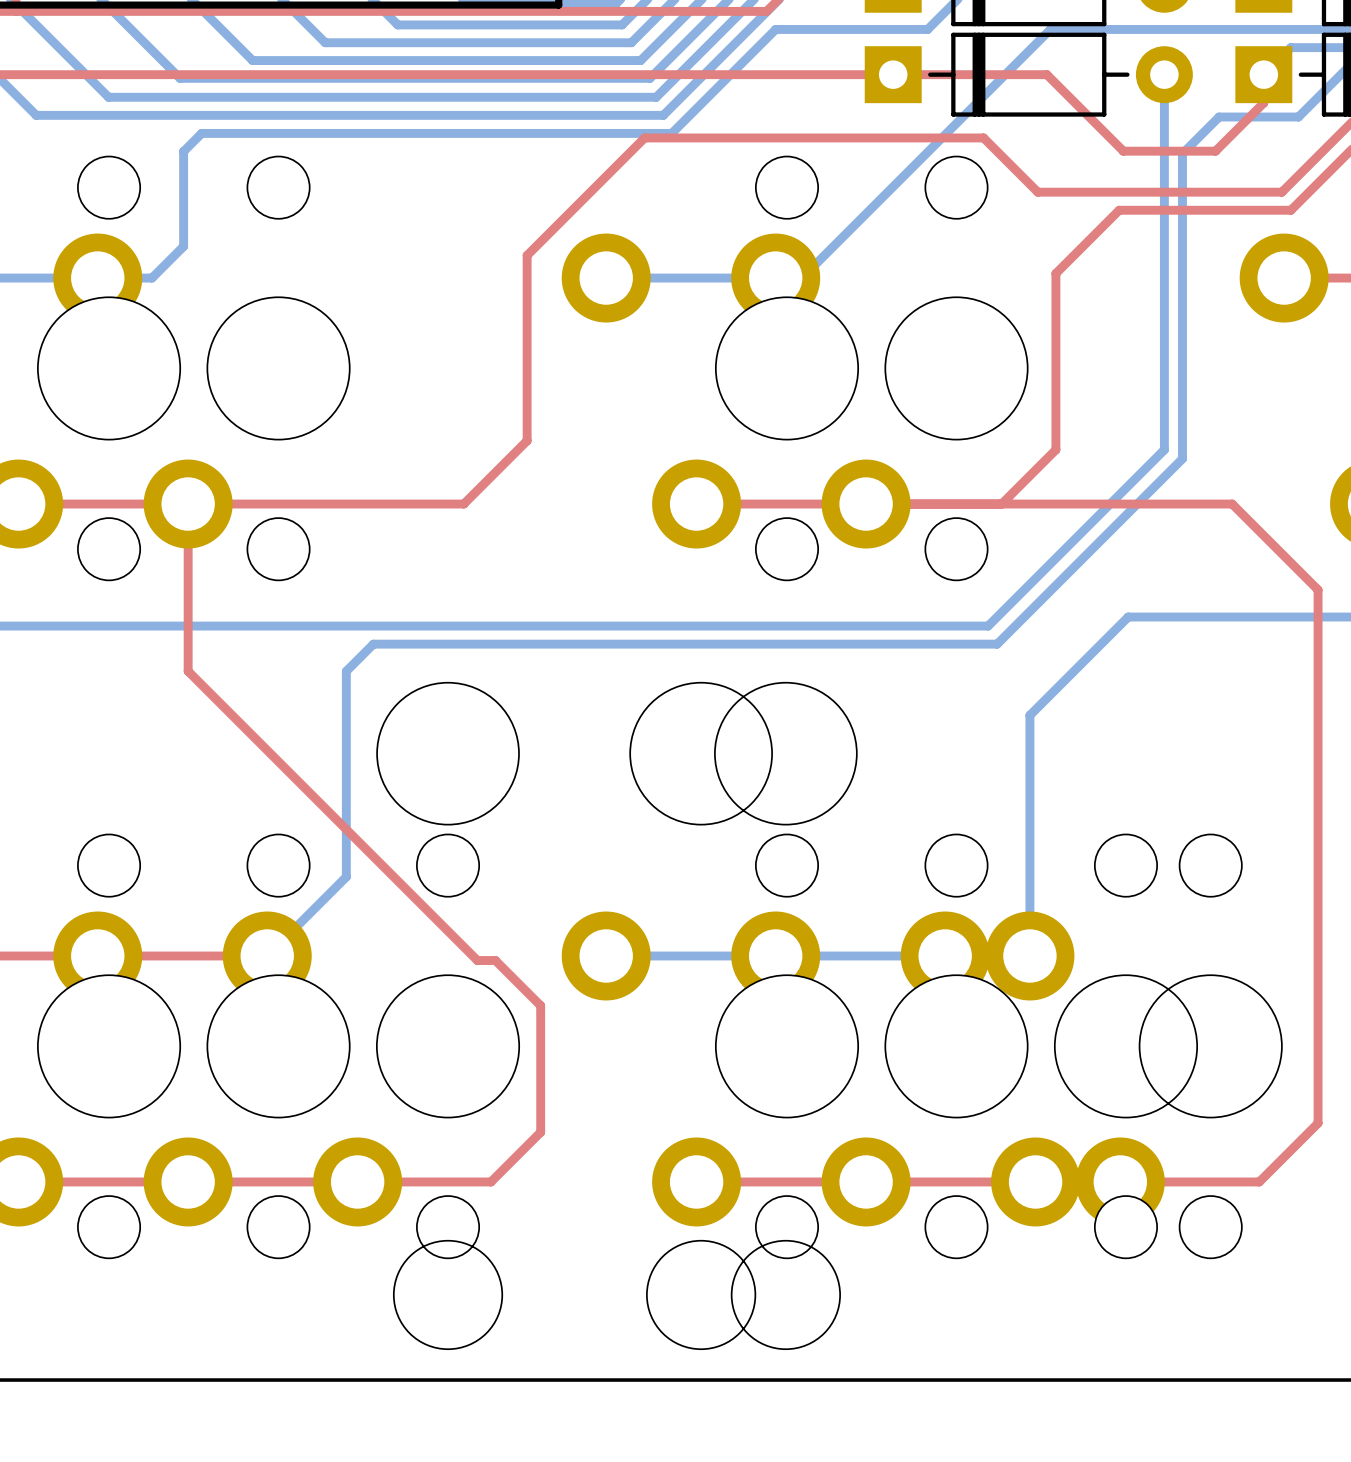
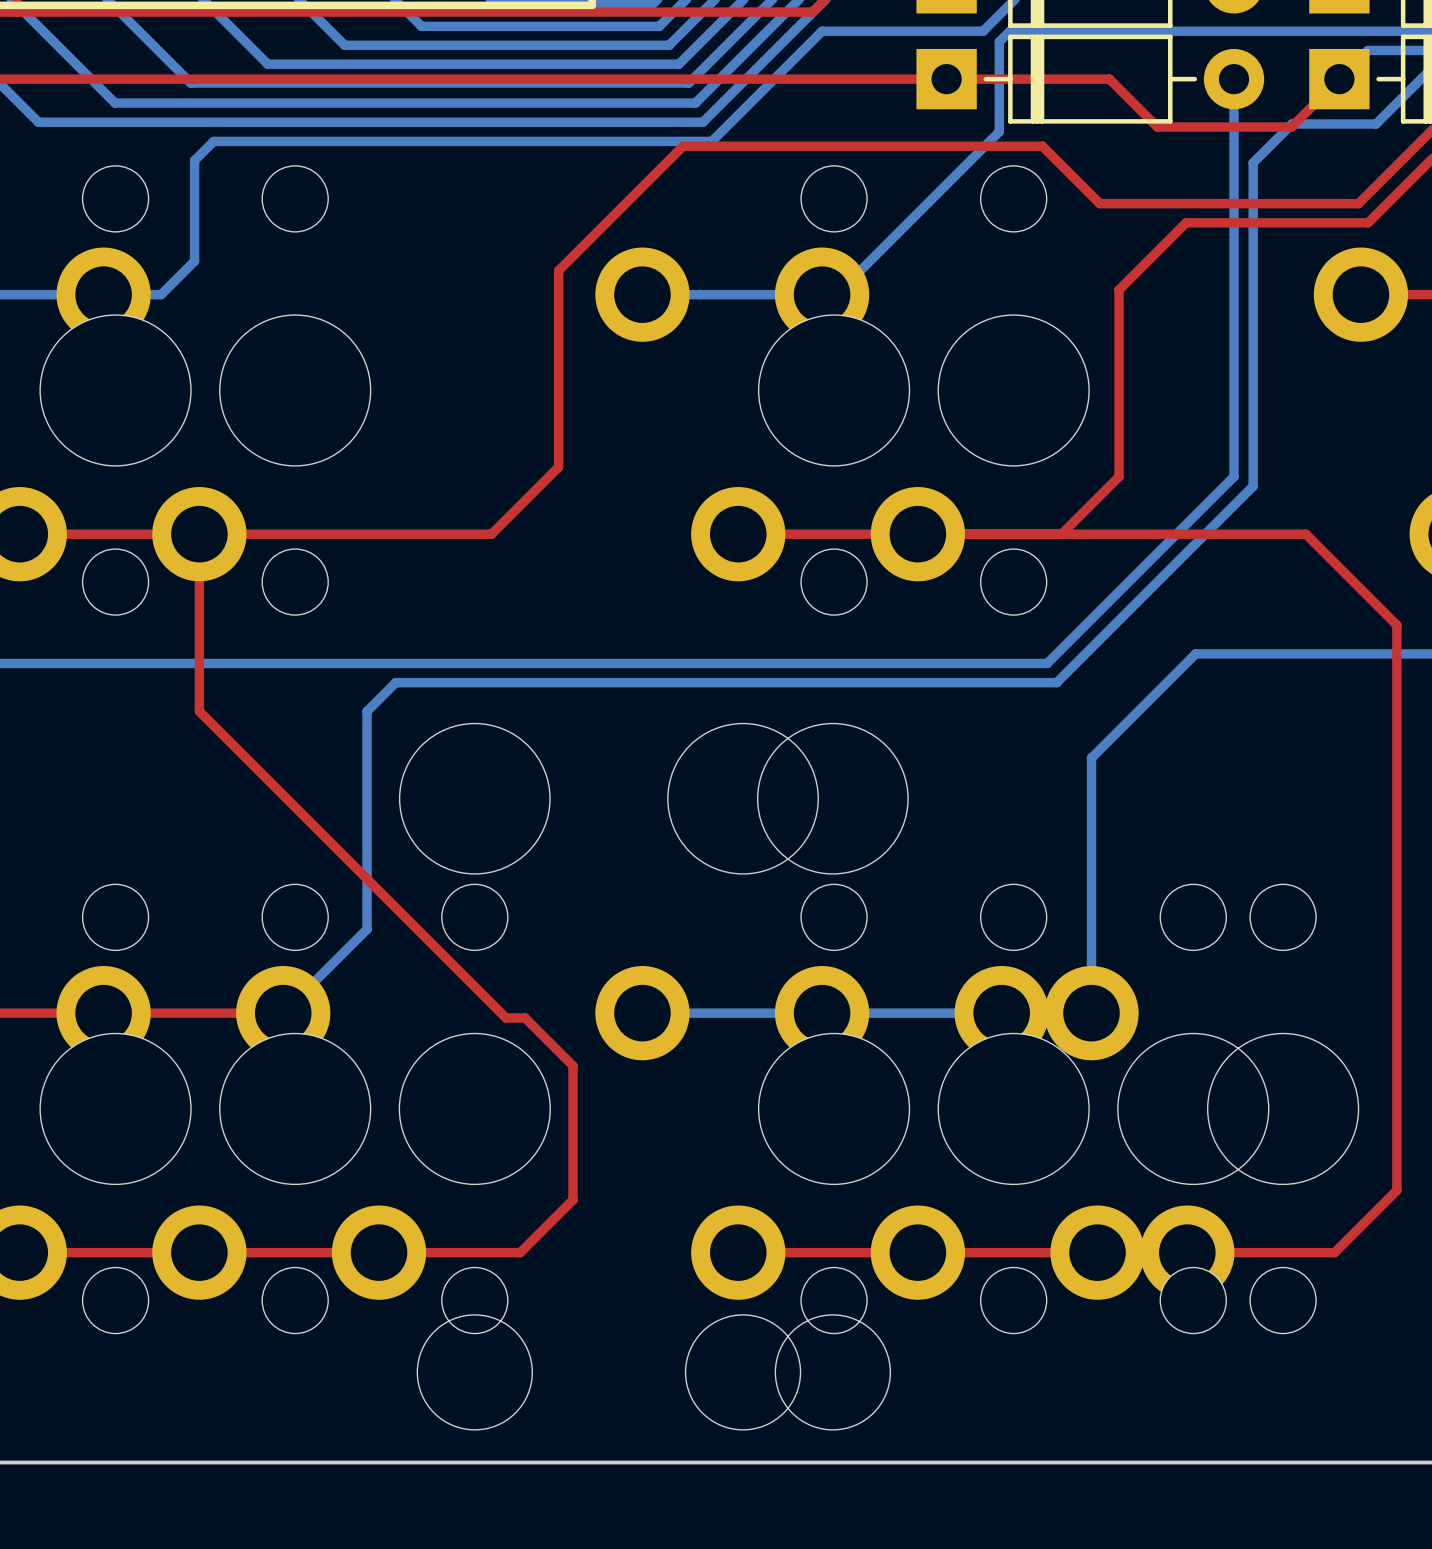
bottom track: (1050, 29) (801, 278) (789, 278) -> (1113, 31) (1009, 31) (999, 41) (999, 131) (836, 294)
top track: (1263, 74) (1263, 102) (1215, 151) (1123, 151) (1092, 119) -> (1339, 79) (1291, 127) (1157, 127)

